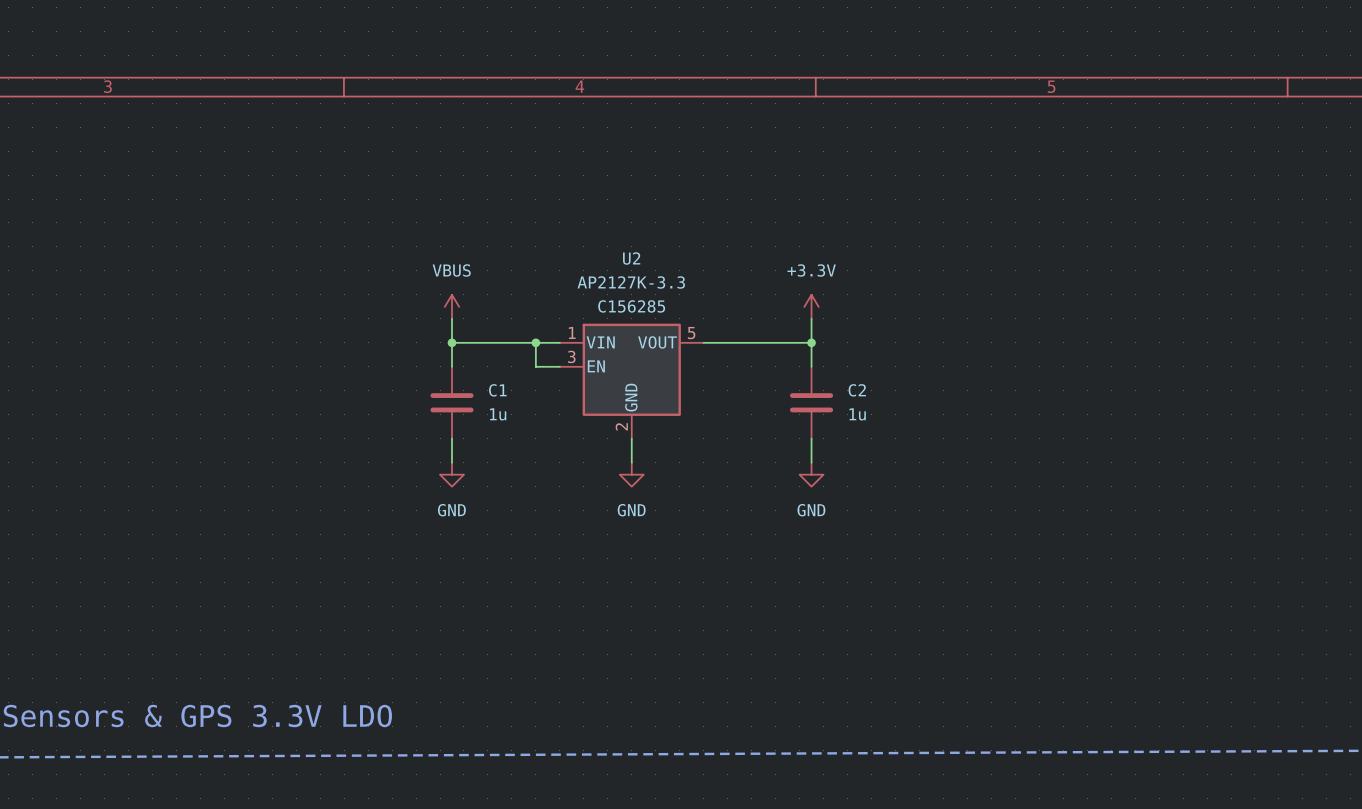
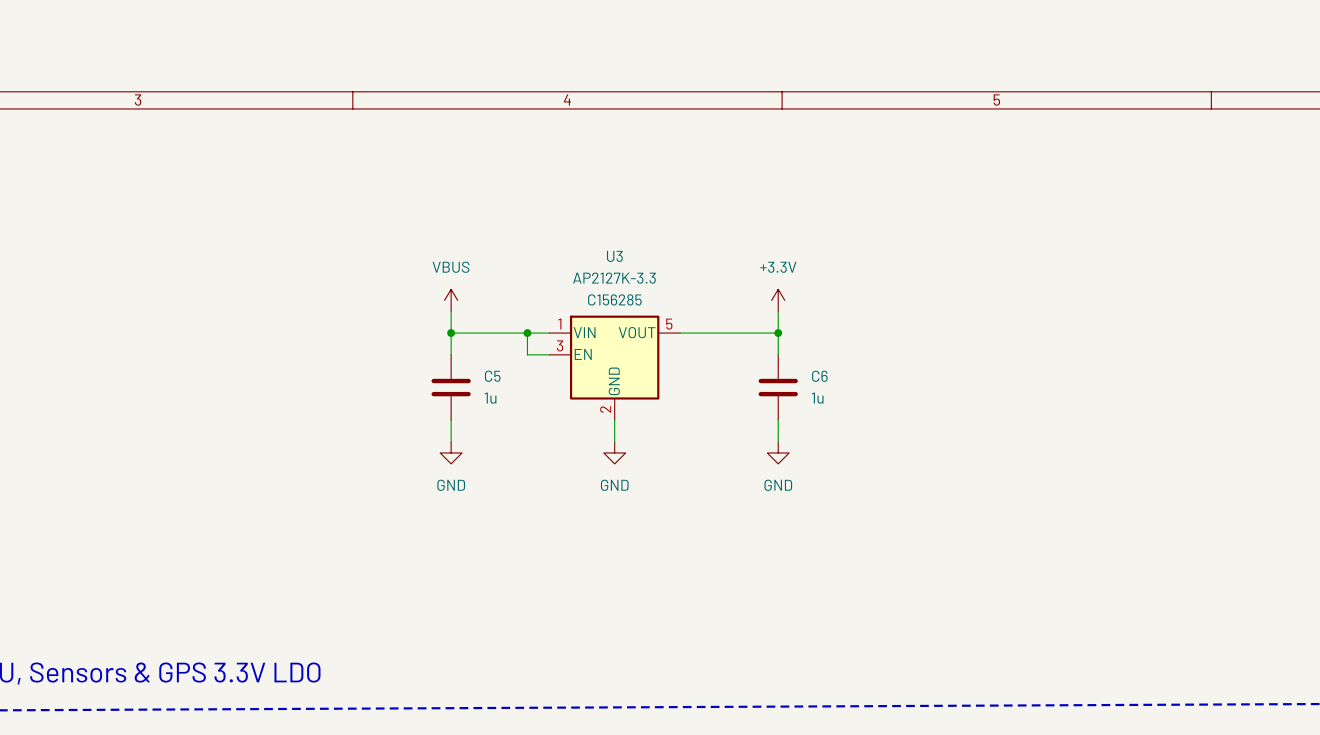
U2 name: U2 (631, 258) -> U3 (614, 256)
C1 name: C1 (497, 390) -> C5 (492, 376)
C2 name: C2 (857, 390) -> C6 (819, 376)

